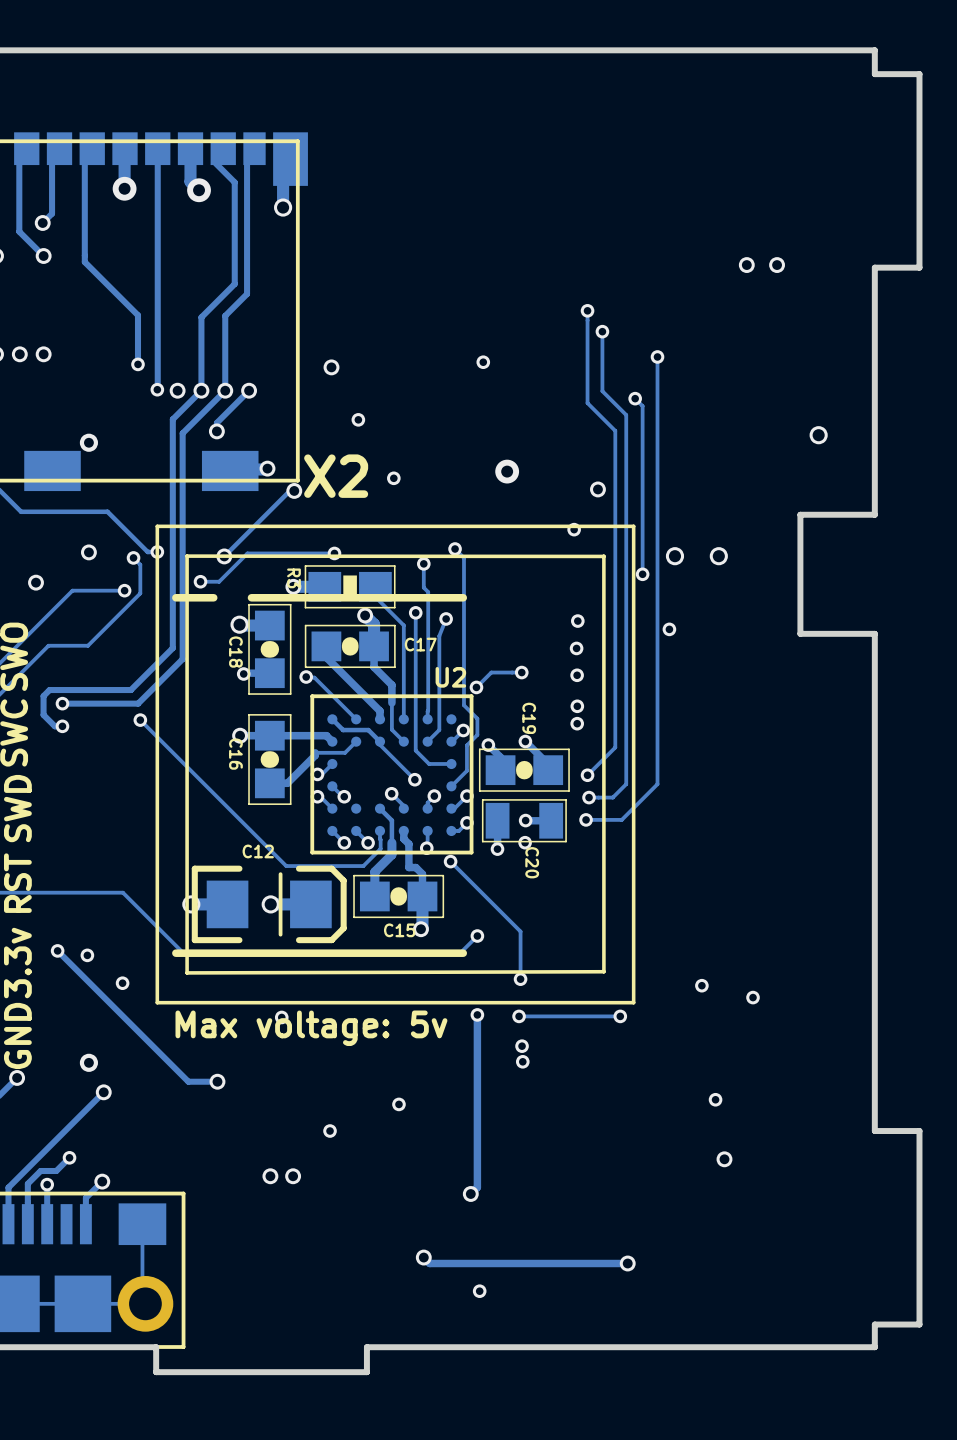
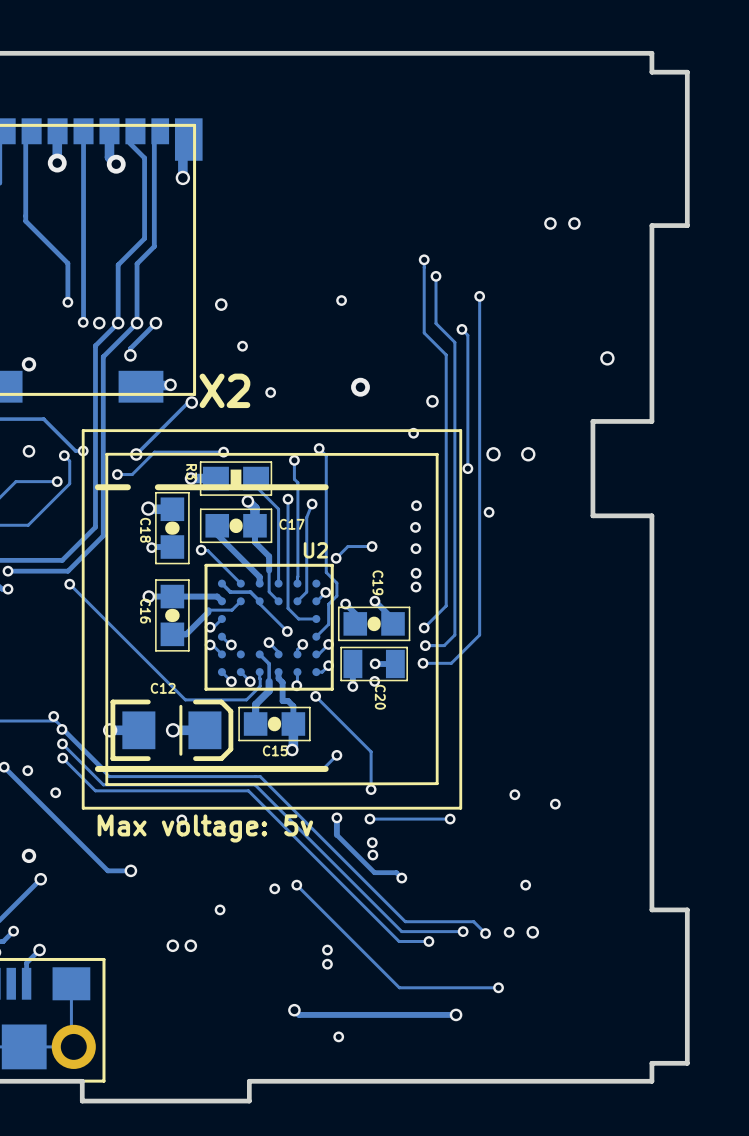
via: none -> (53, 716)
track: none -> (61, 729) (109, 776) (260, 776) (405, 921) (473, 921) (485, 933)
via: none -> (61, 729)
track: none -> (62, 743) (103, 784) (255, 784) (401, 931) (463, 931)
via: none -> (62, 743)
track: none -> (62, 758) (95, 790) (248, 790) (399, 941) (428, 941)
via: none -> (62, 758)
track: (477, 1036) (477, 1187) (470, 1194) -> (336, 835) (374, 872) (396, 872) (401, 878)
via: none -> (401, 878)
track: none -> (296, 885) (399, 987) (498, 987)
via: none -> (296, 885)
via: none -> (463, 931)
via: none -> (509, 932)
via: none -> (485, 933)
via: none -> (428, 941)
via: none -> (327, 950)
via: (470, 1194) -> none
via: none -> (327, 964)
via: none -> (498, 987)

